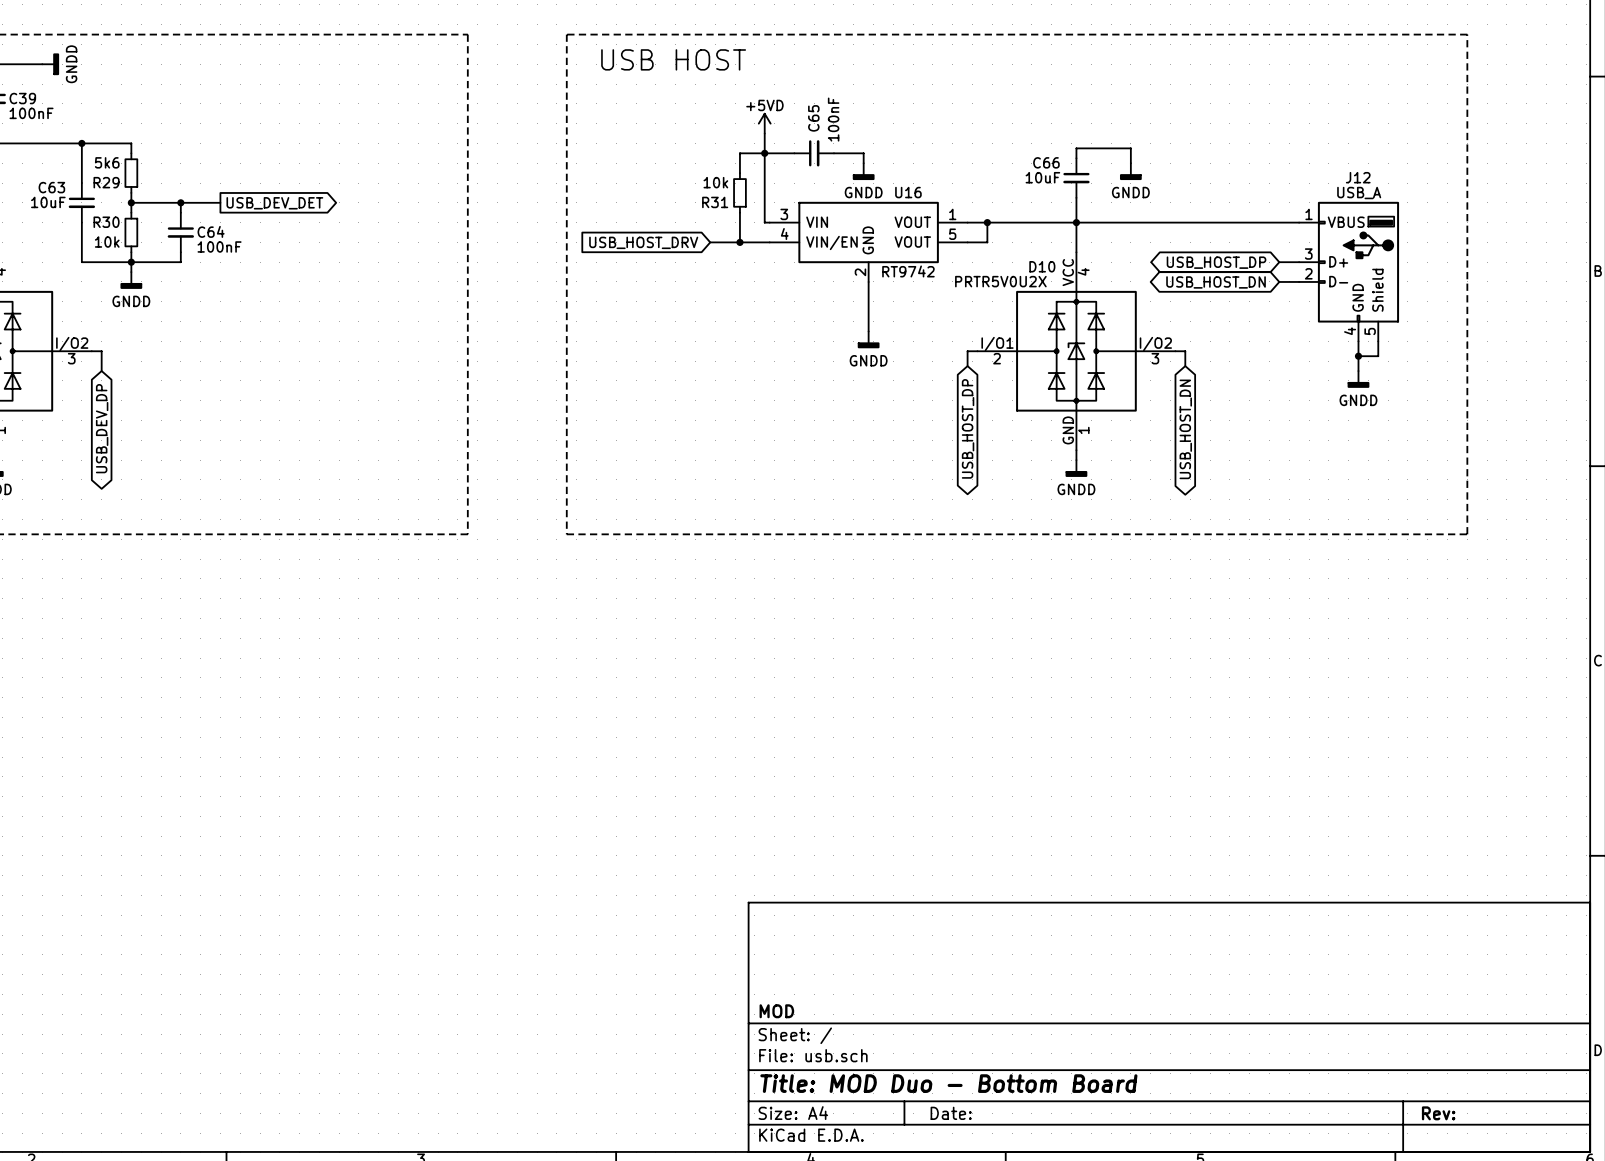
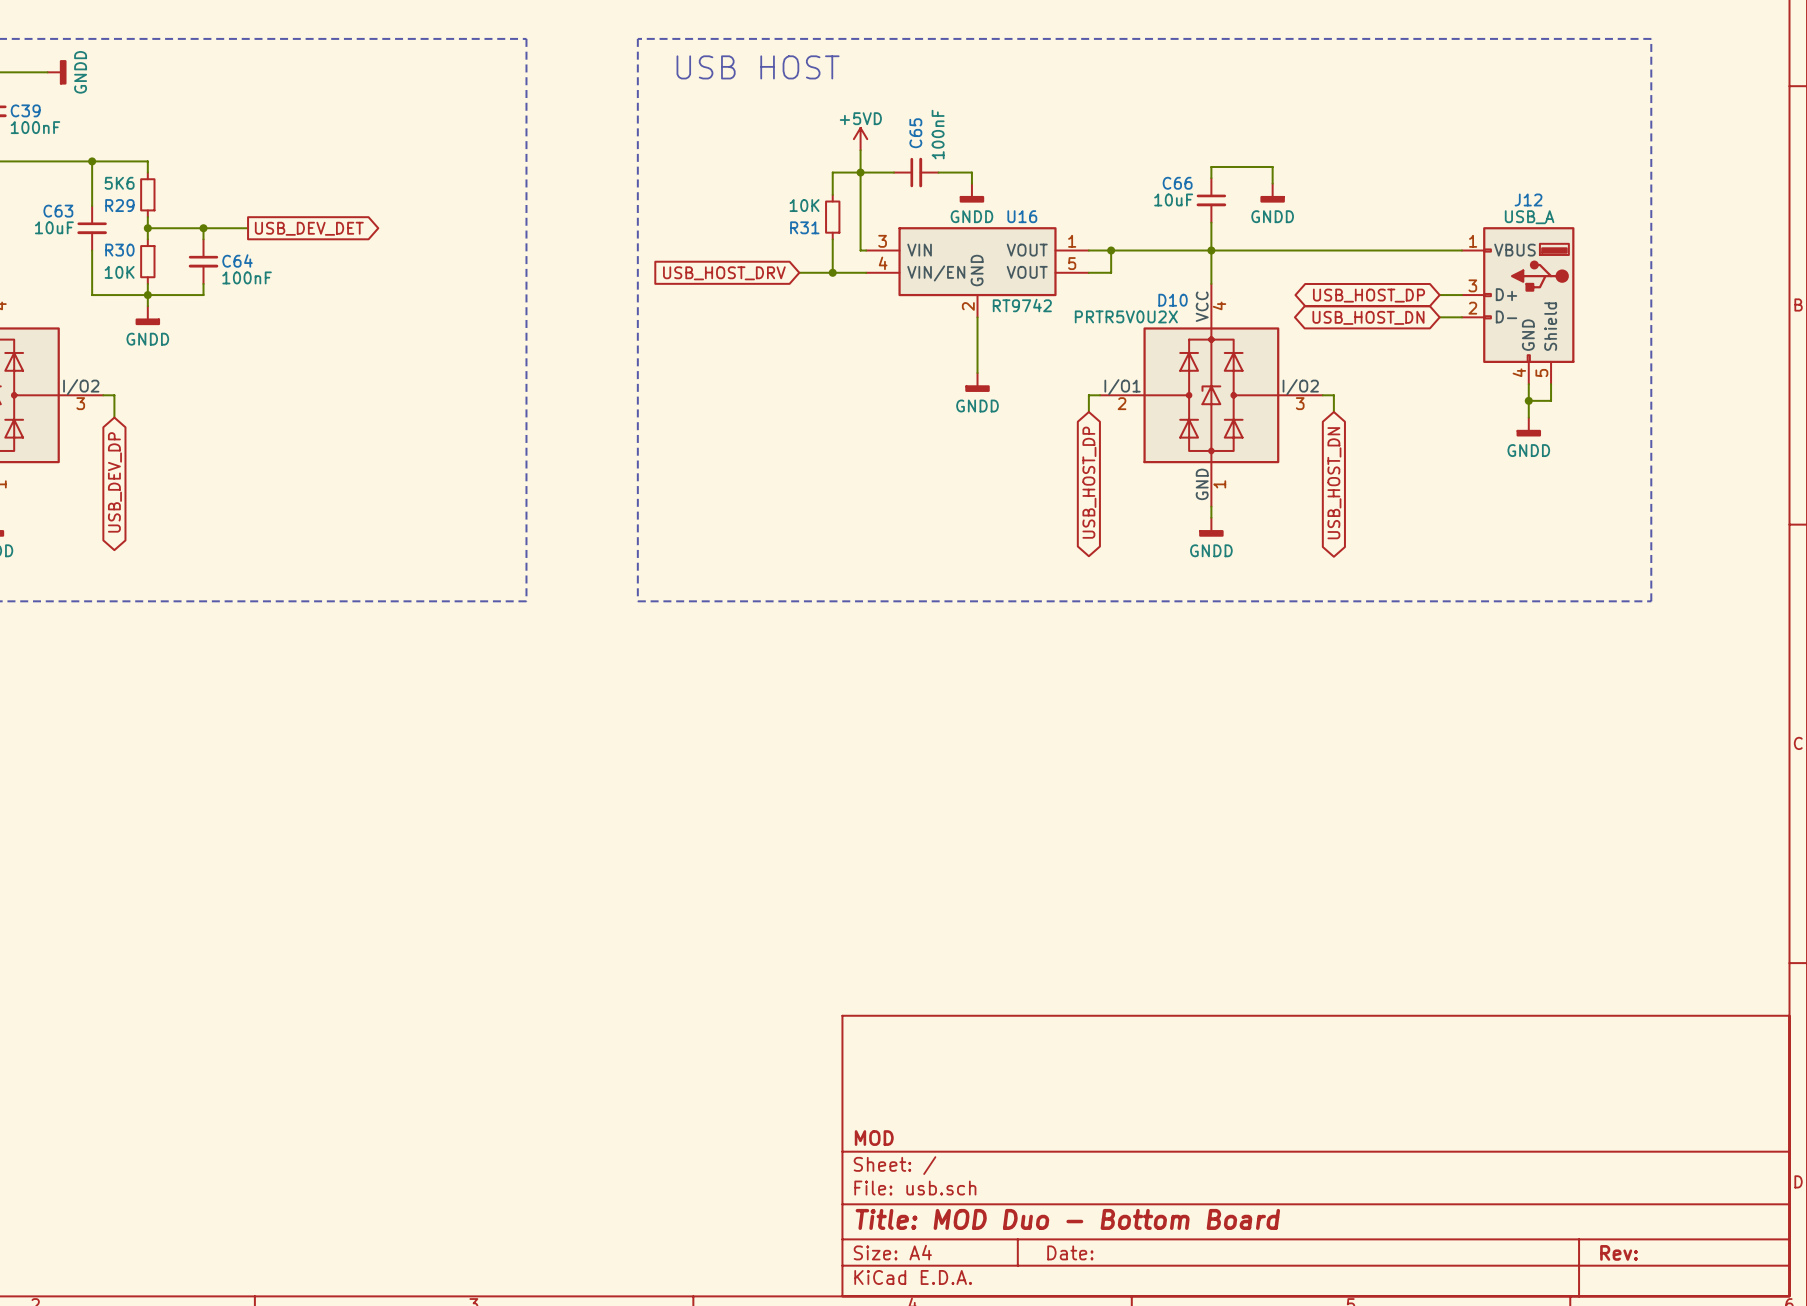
R29 value: 5k6 (107, 162) -> 5K6 (119, 183)
R31 value: 10k (715, 182) -> 10K (804, 205)
R30 value: 10k (107, 242) -> 10K (119, 272)

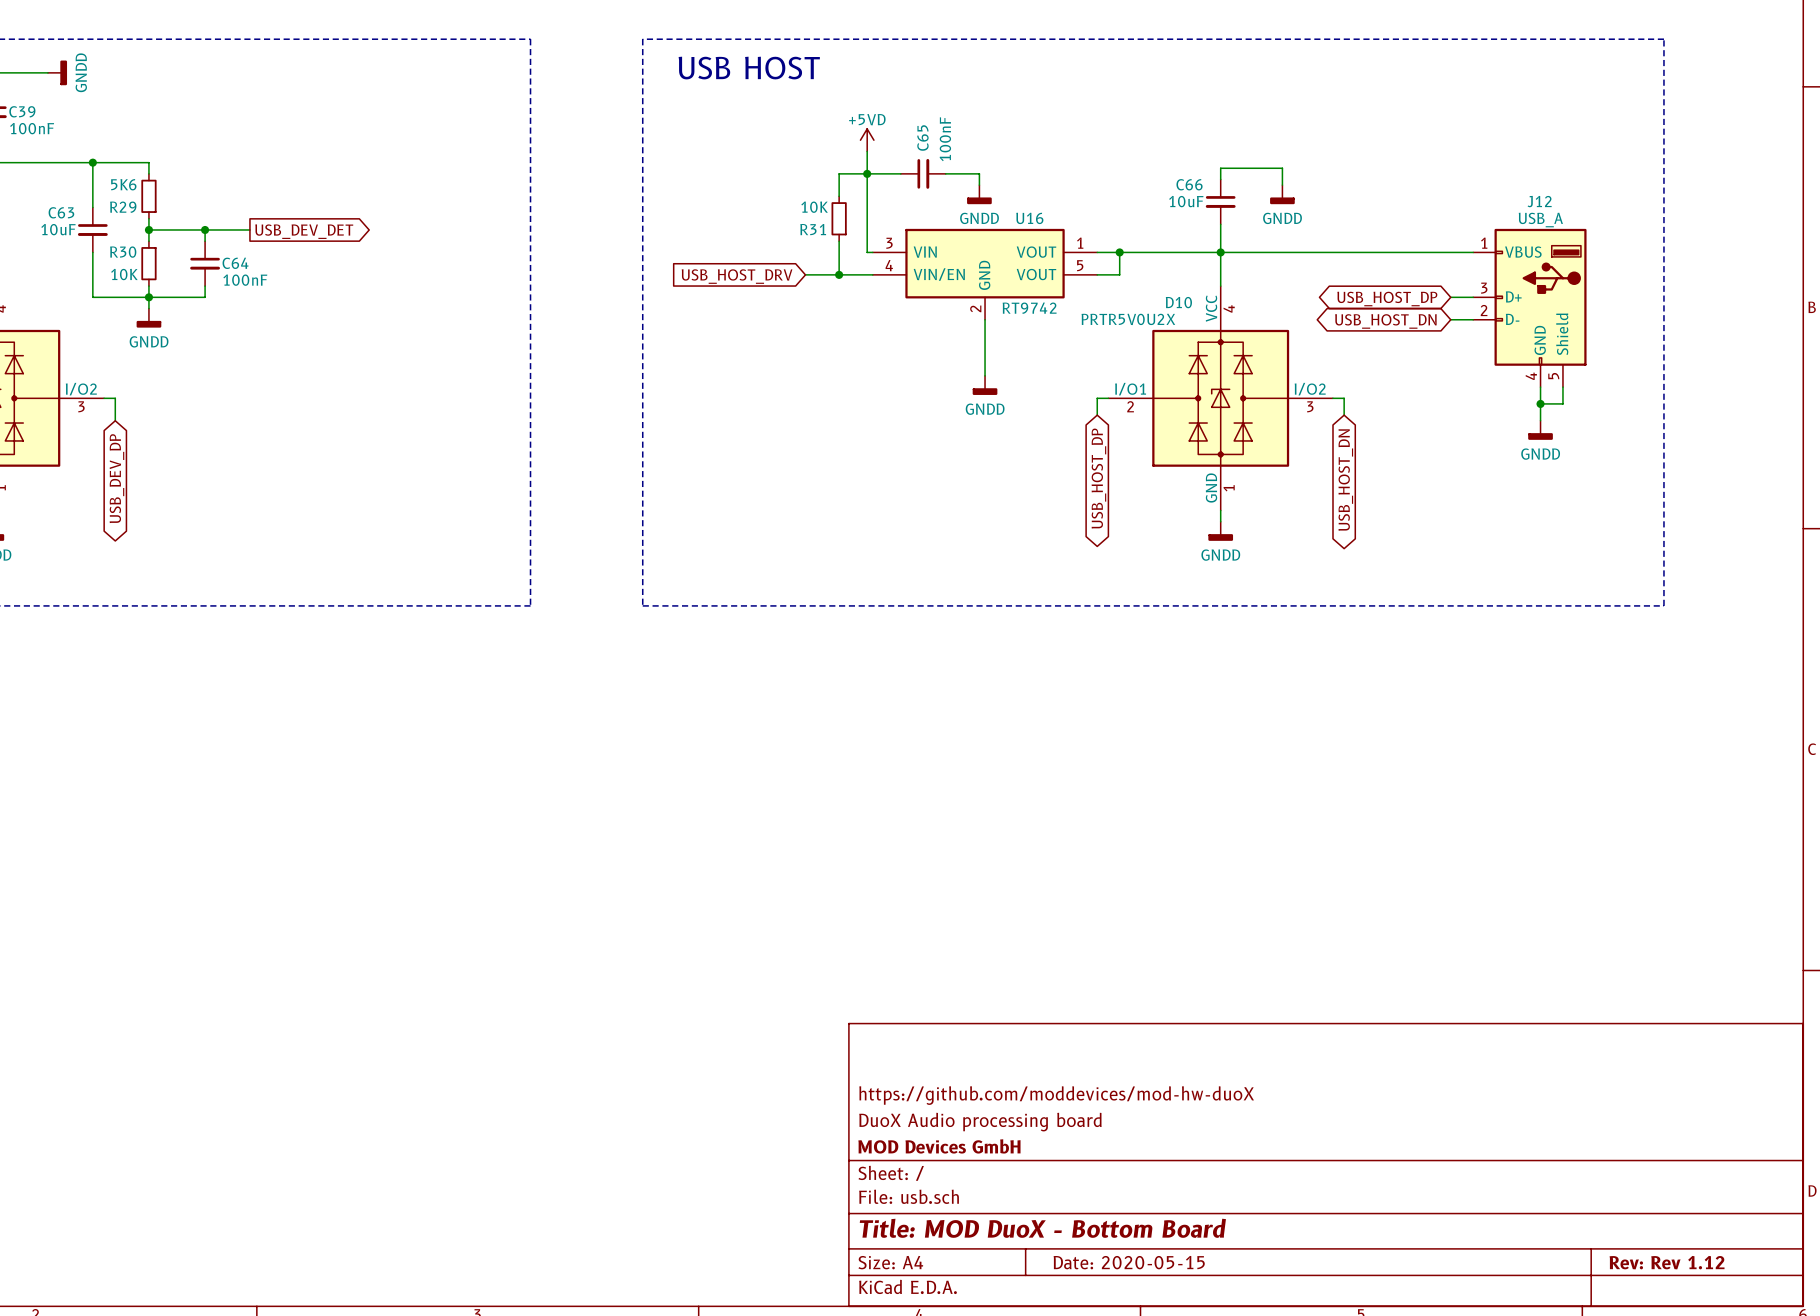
title block: none -> https://github.com/moddevices/mod-hw-duoX (1056, 1095)
title block: none -> DuoX Audio processing board (980, 1122)
title block: MOD (874, 1138) -> MOD Devices GmbH (939, 1146)
title block: Title: MOD Duo - Bottom Board (1067, 1219) -> Title: MOD DuoX - Bottom Board (1042, 1228)
title block: Date: (1070, 1252) -> Date: 2020-05-15 (1129, 1262)
title block: Rev: (1618, 1252) -> Rev: Rev 1.12 (1667, 1262)

